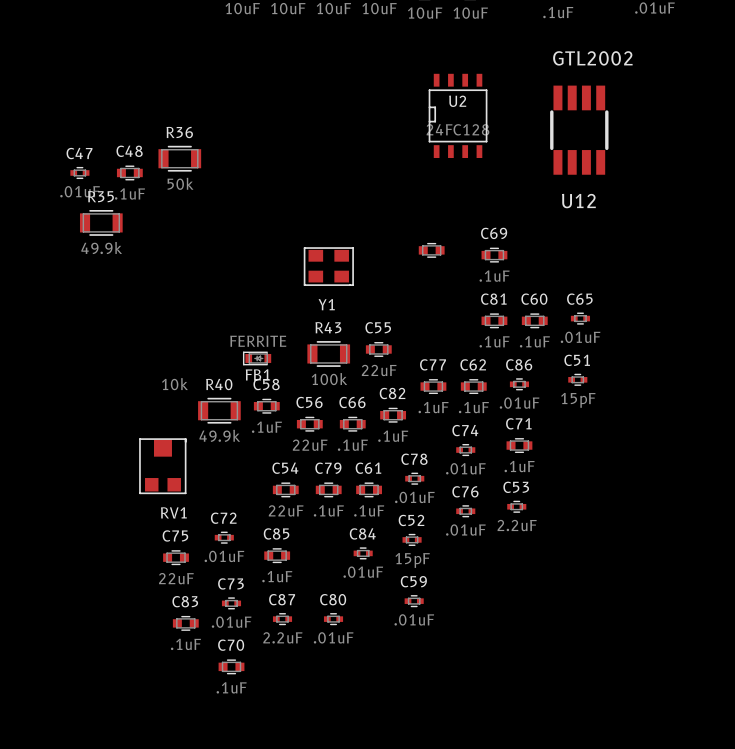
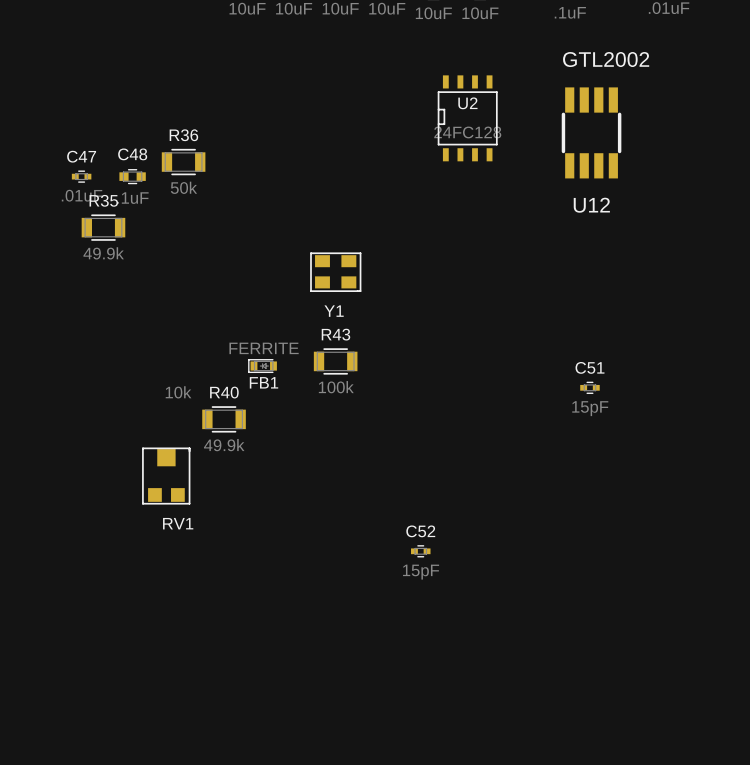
part: (431, 250) -> none
C69: .1uF (494, 255) -> none
C65: .01uF (580, 318) -> none
C81: .1uF (494, 320) -> none
C60: .1uF (534, 320) -> none
C55: 22uF (378, 349) -> none
C86: .01uF (519, 384) -> none
C77: .1uF (433, 386) -> none
C62: .1uF (473, 386) -> none
C58: .1uF (266, 406) -> none
C82: .1uF (393, 415) -> none
C56: 22uF (309, 424) -> none
C66: .1uF (352, 424) -> none
C71: .1uF (519, 445) -> none
C74: .01uF (465, 450) -> none
C78: .01uF (414, 478) -> none
C54: 22uF (285, 489) -> none
C79: .1uF (328, 489) -> none
C61: .1uF (369, 489) -> none
C53: 2.2uF (516, 506) -> none
C76: .01uF (465, 511) -> none
C72: .01uF (224, 537) -> none
C84: .01uF (363, 553) -> none
C85: .1uF (277, 555) -> none
C75: 22uF (176, 557) -> none
C59: .01uF (414, 601) -> none
C73: .01uF (231, 603) -> none
C87: 2.2uF (282, 619) -> none
C80: .01uF (333, 619) -> none
C83: .1uF (185, 623) -> none
C70: .1uF (231, 666) -> none

